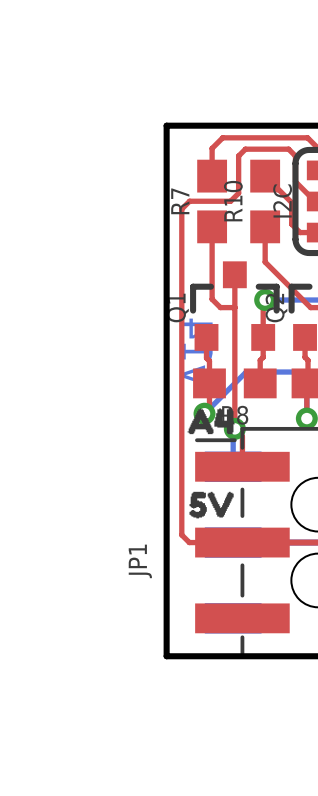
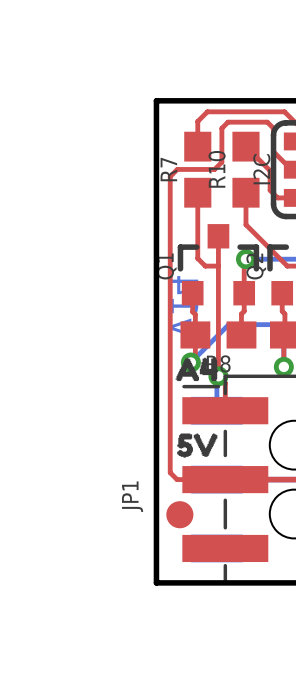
part: none -> (179, 514)

